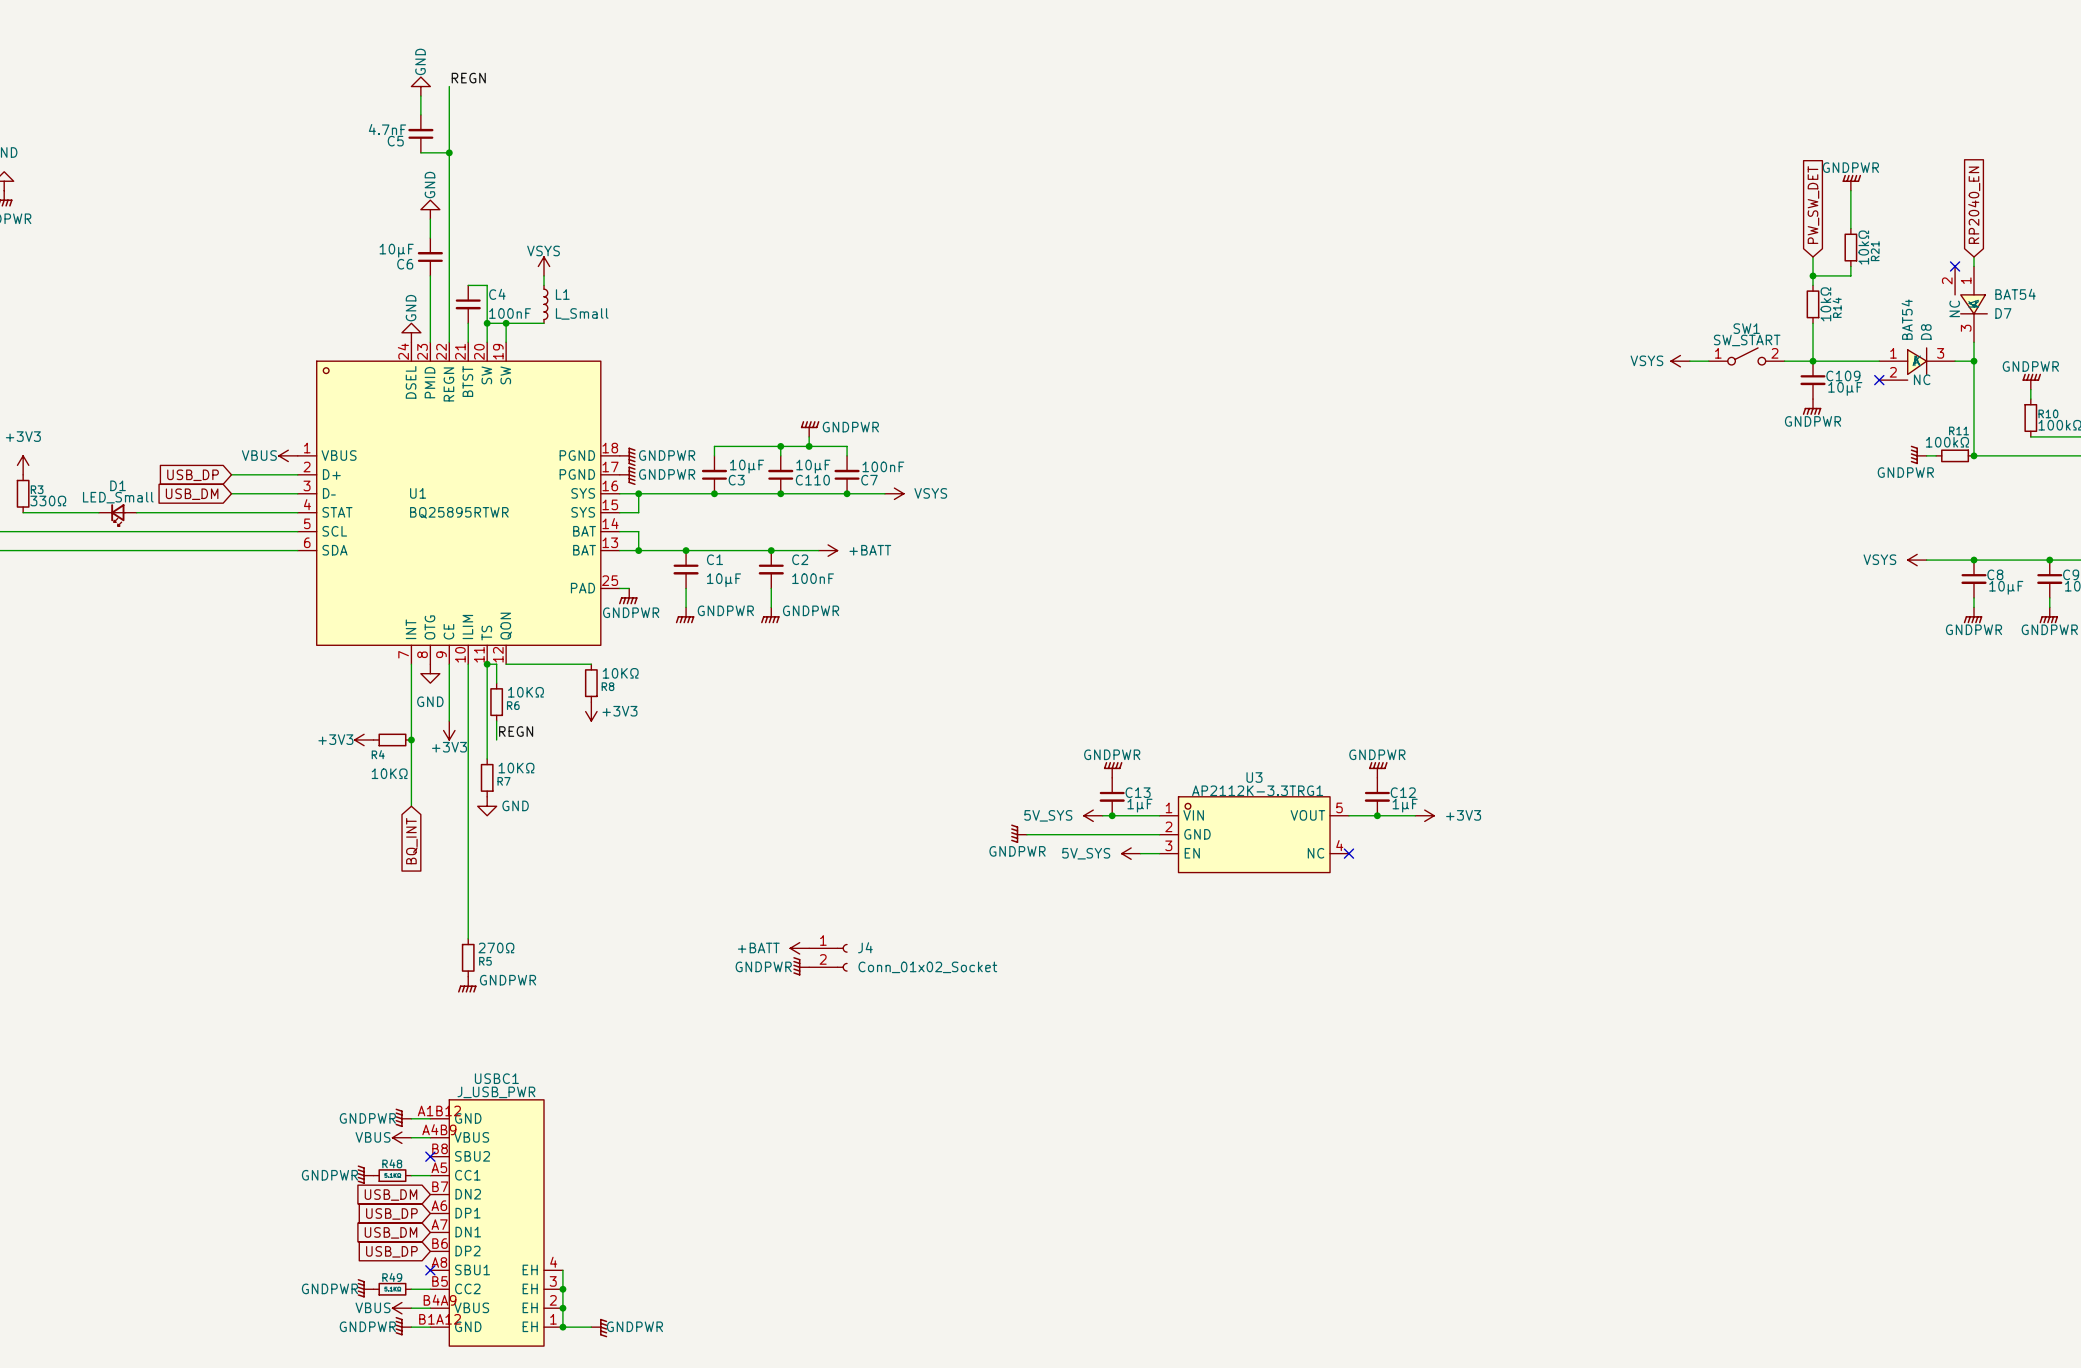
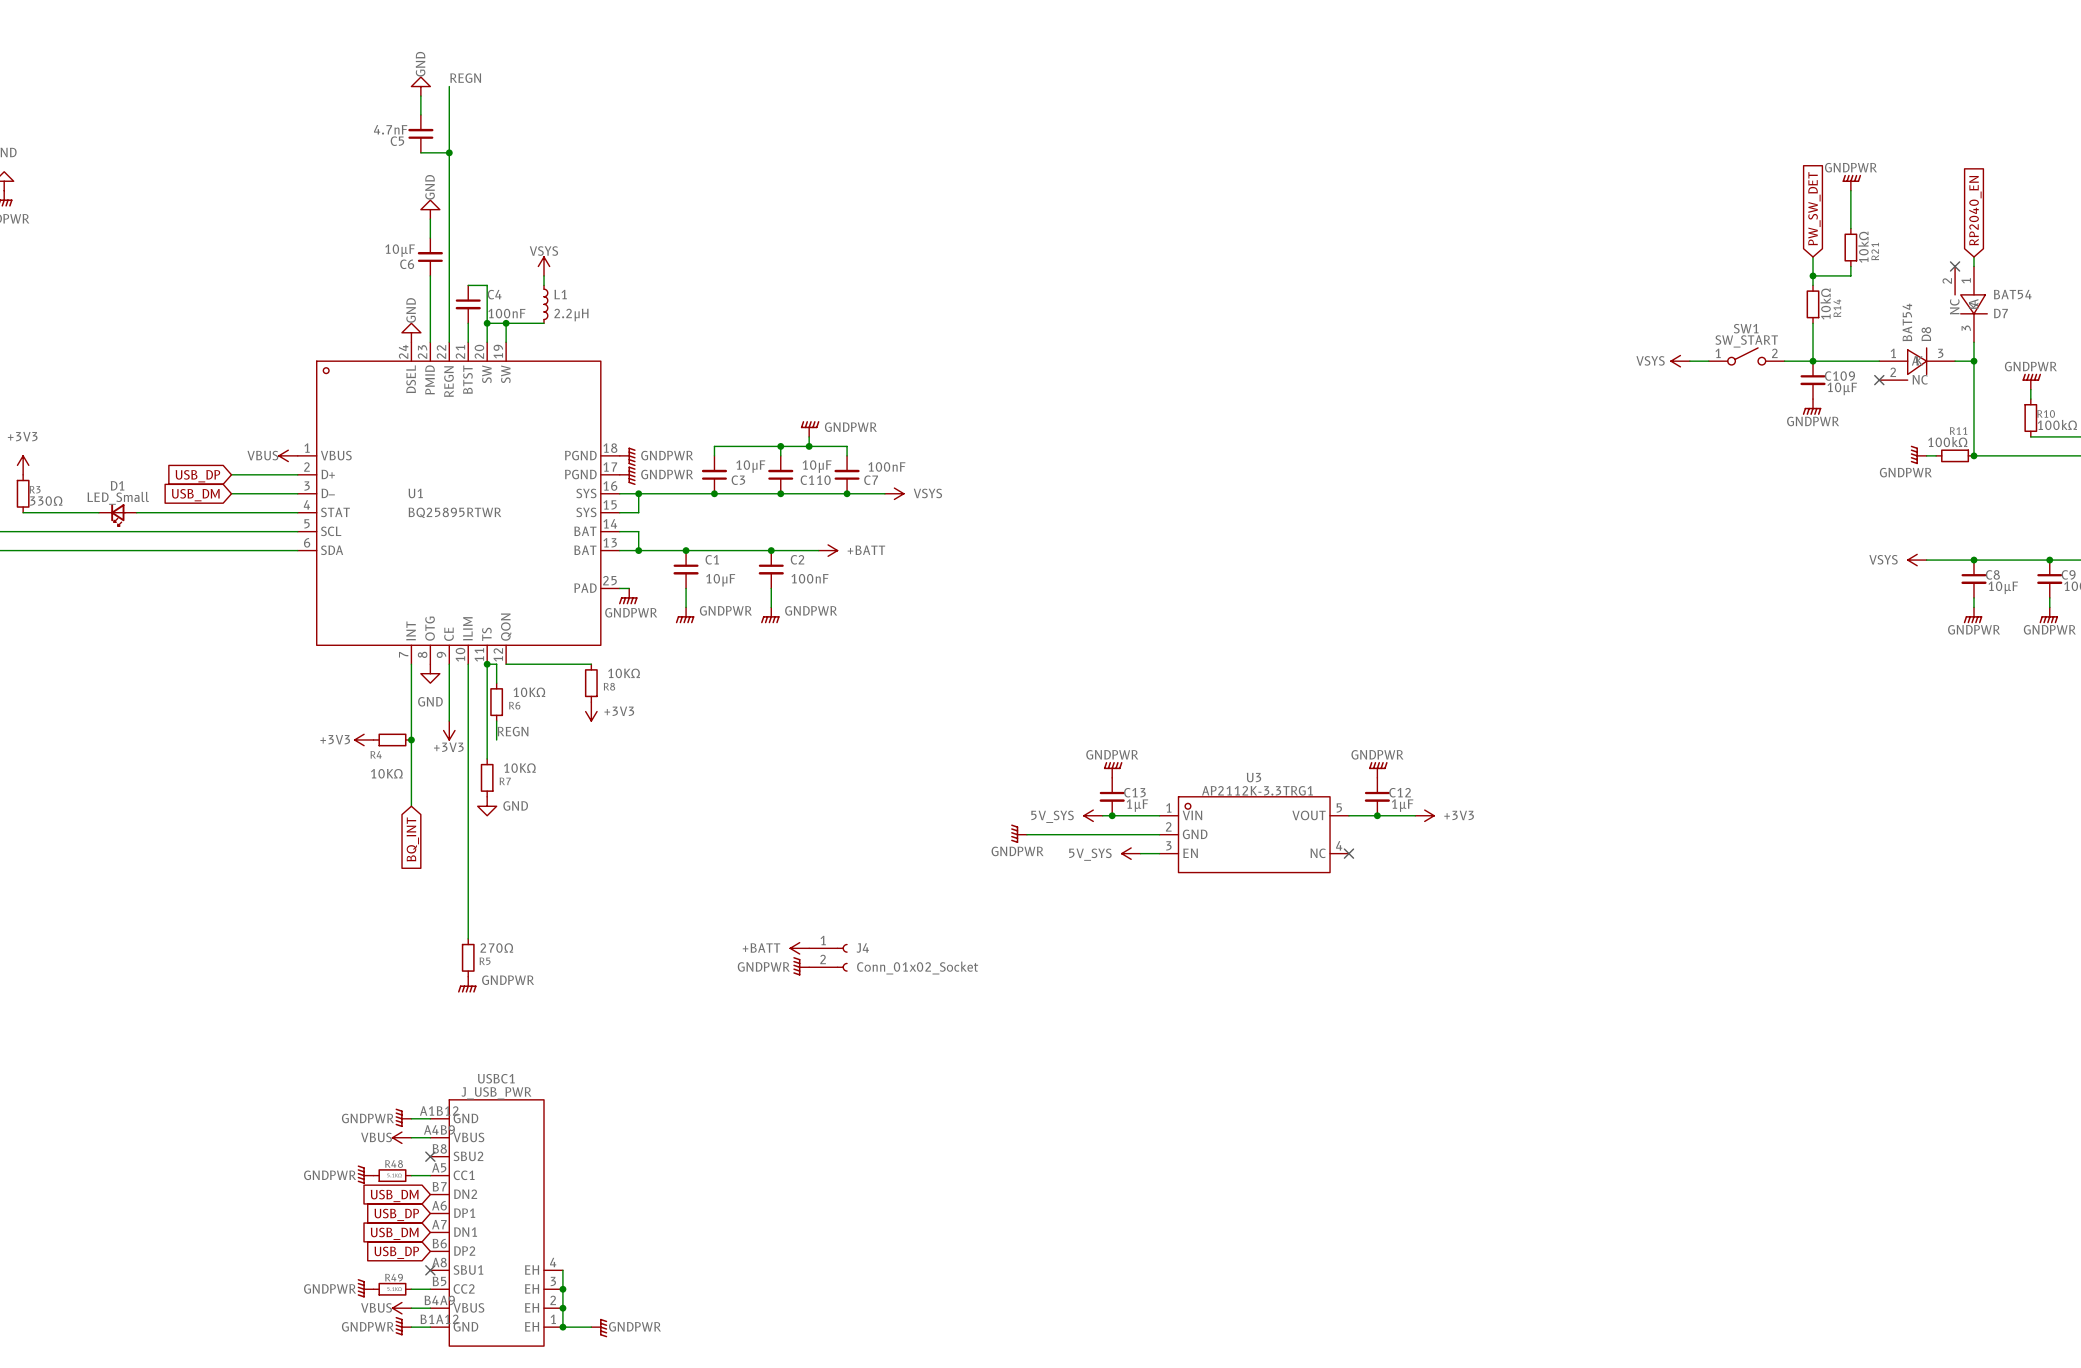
L1 value: L_Small (582, 313) -> 2.2μH (571, 315)

